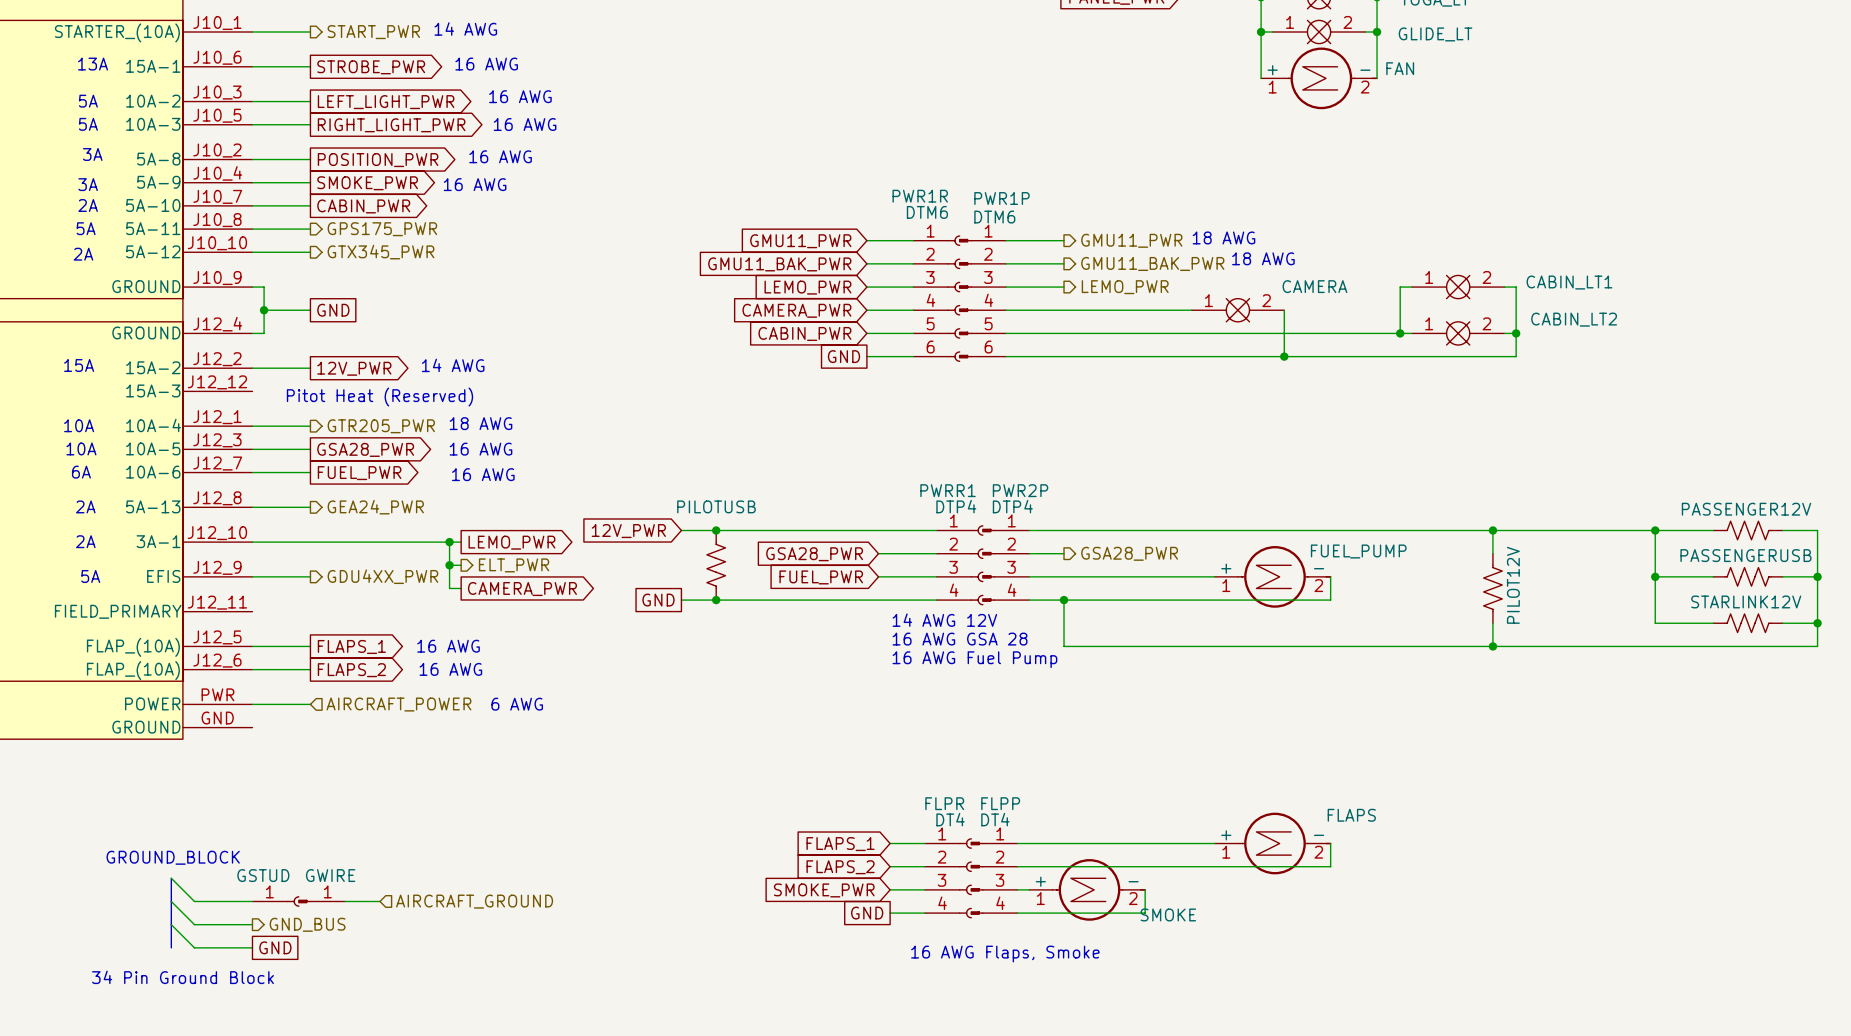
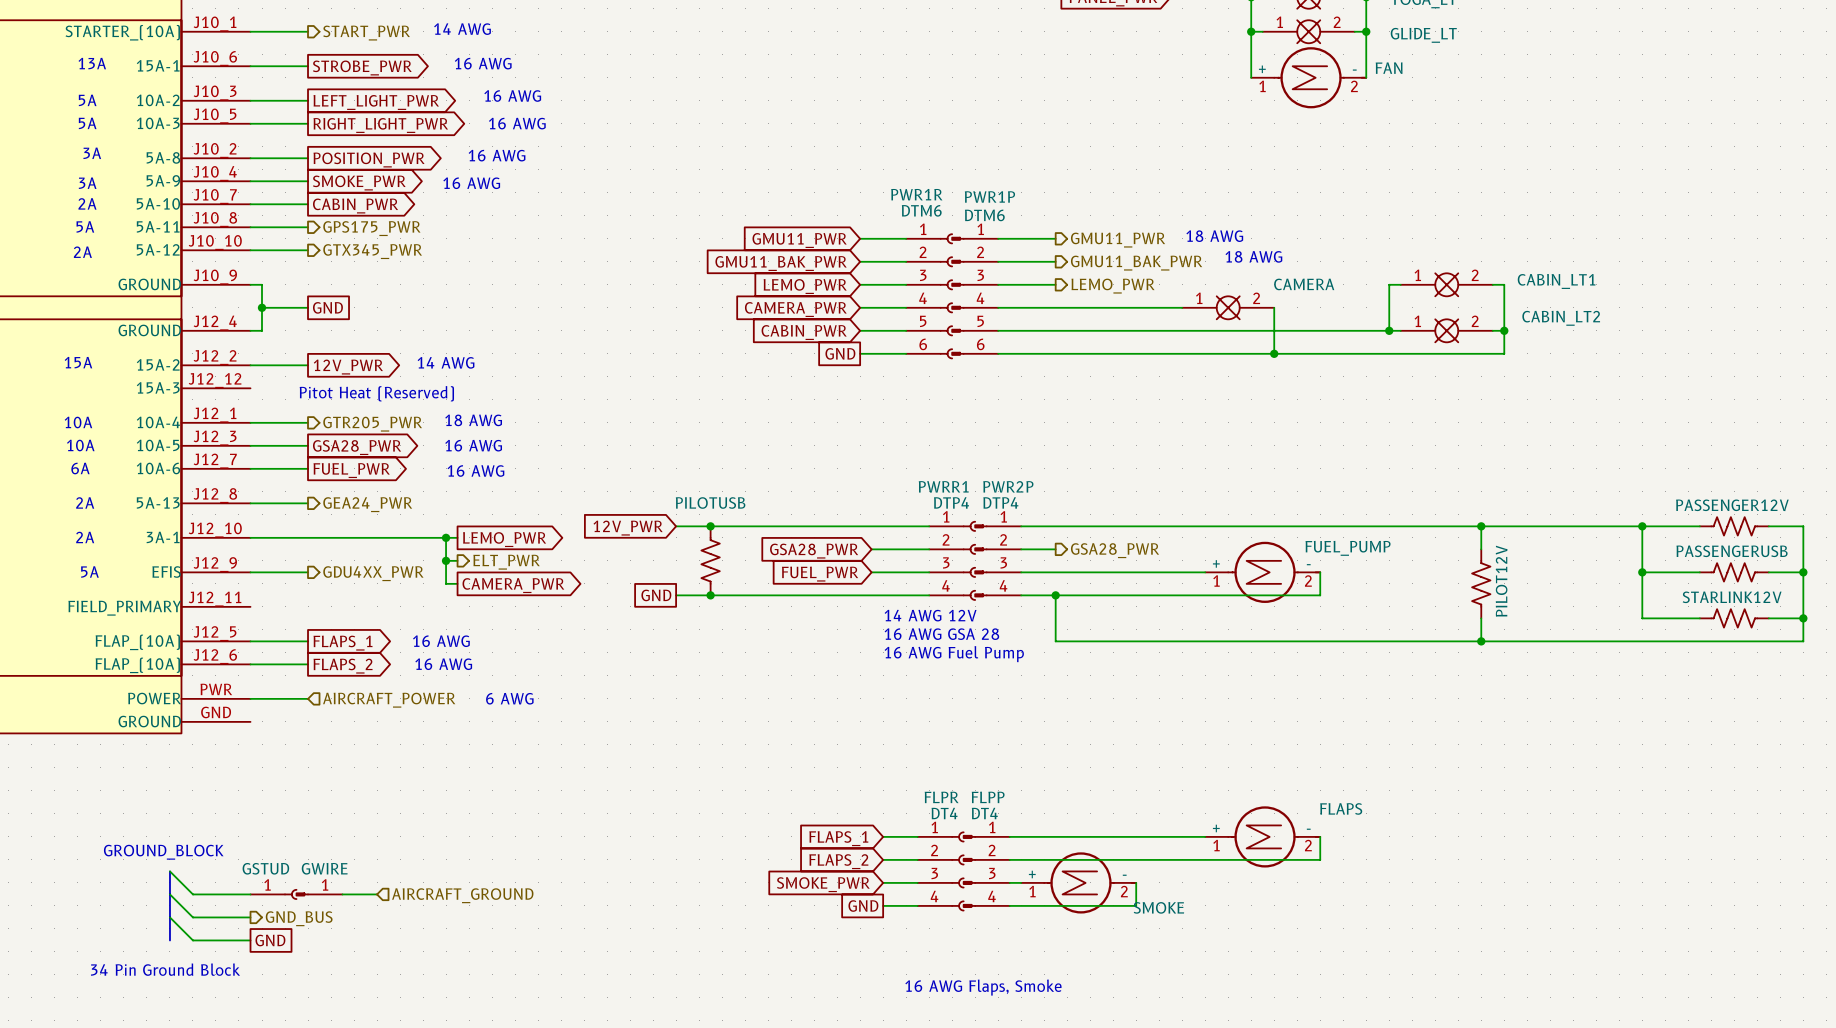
text position: 16 AWG Flaps, Smoke (1005, 954) -> 16 AWG Flaps, Smoke (983, 987)

